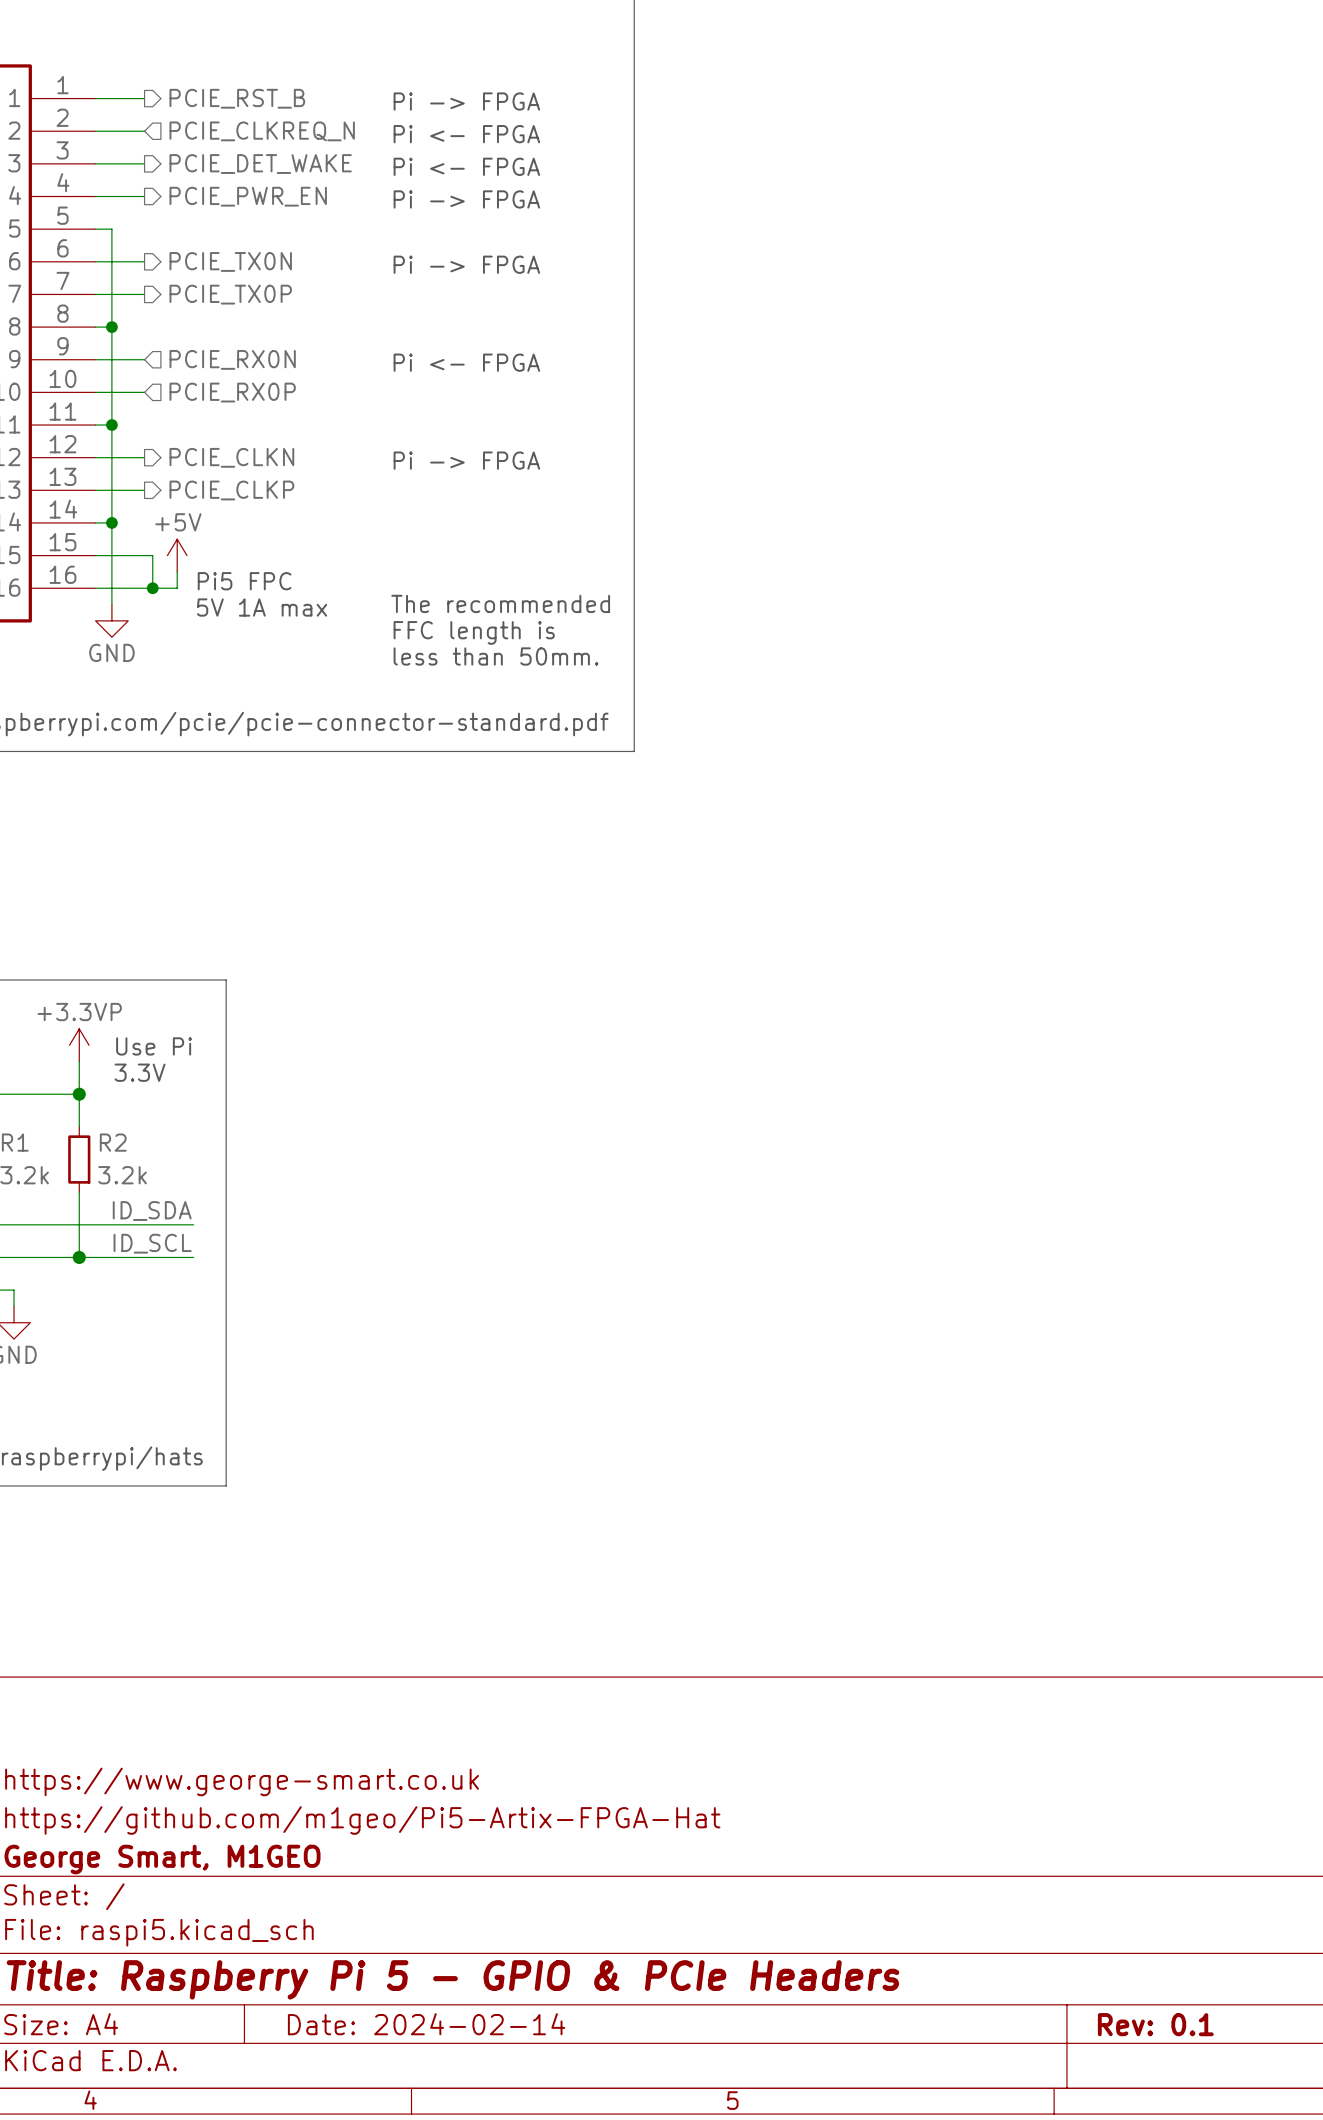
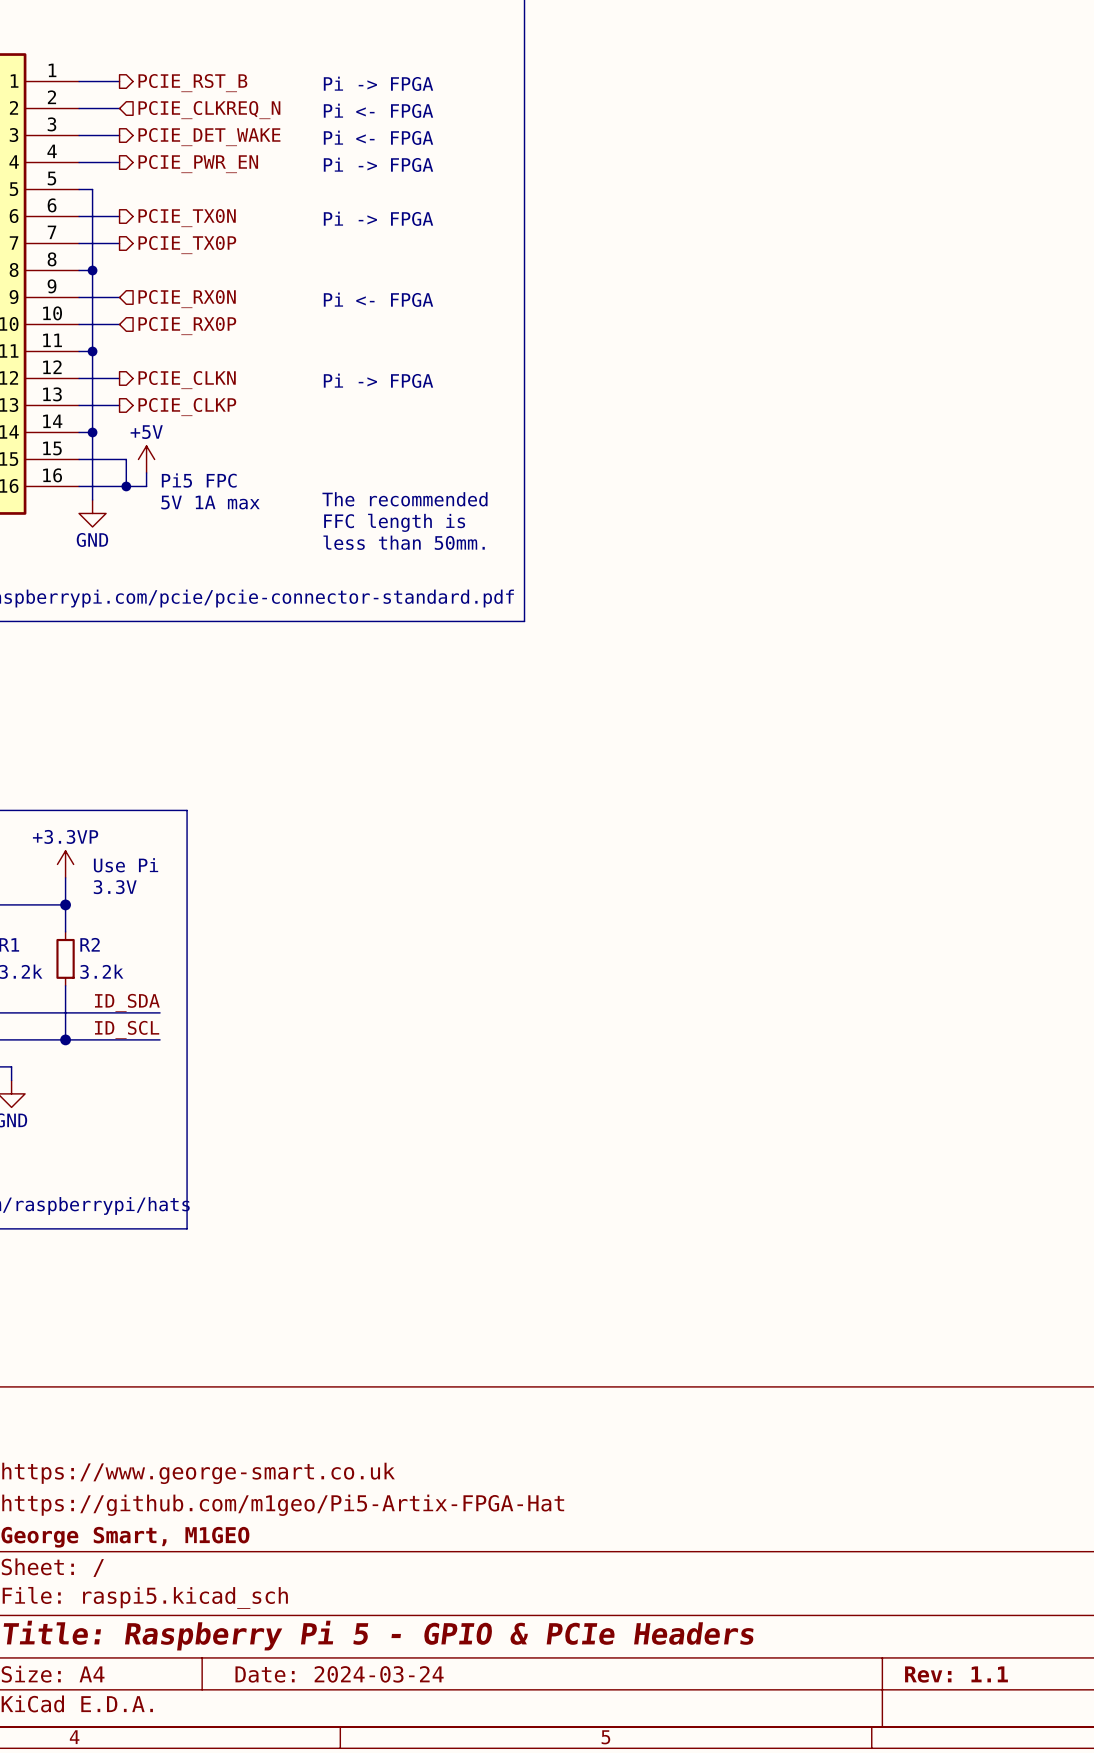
title block: Date: 2024-02-14 (426, 2024) -> Date: 2024-03-24 (339, 1674)
title block: Rev: 0.1 (1155, 2024) -> Rev: 1.1 (956, 1674)

